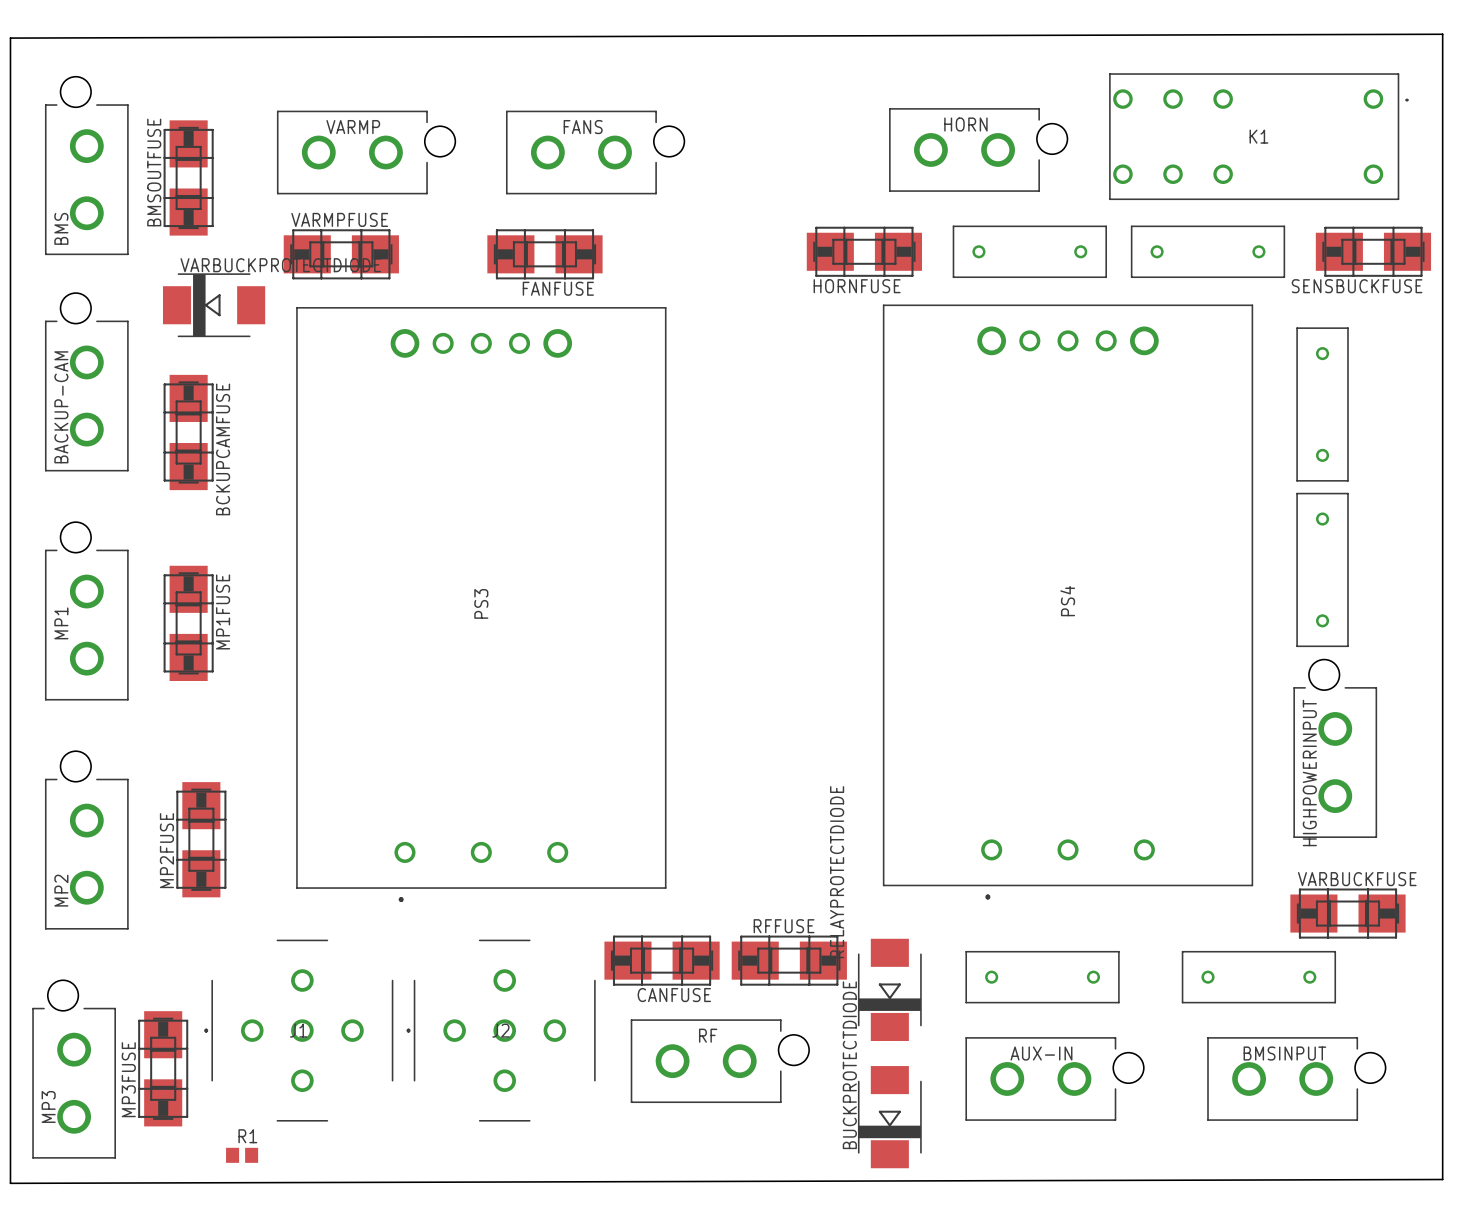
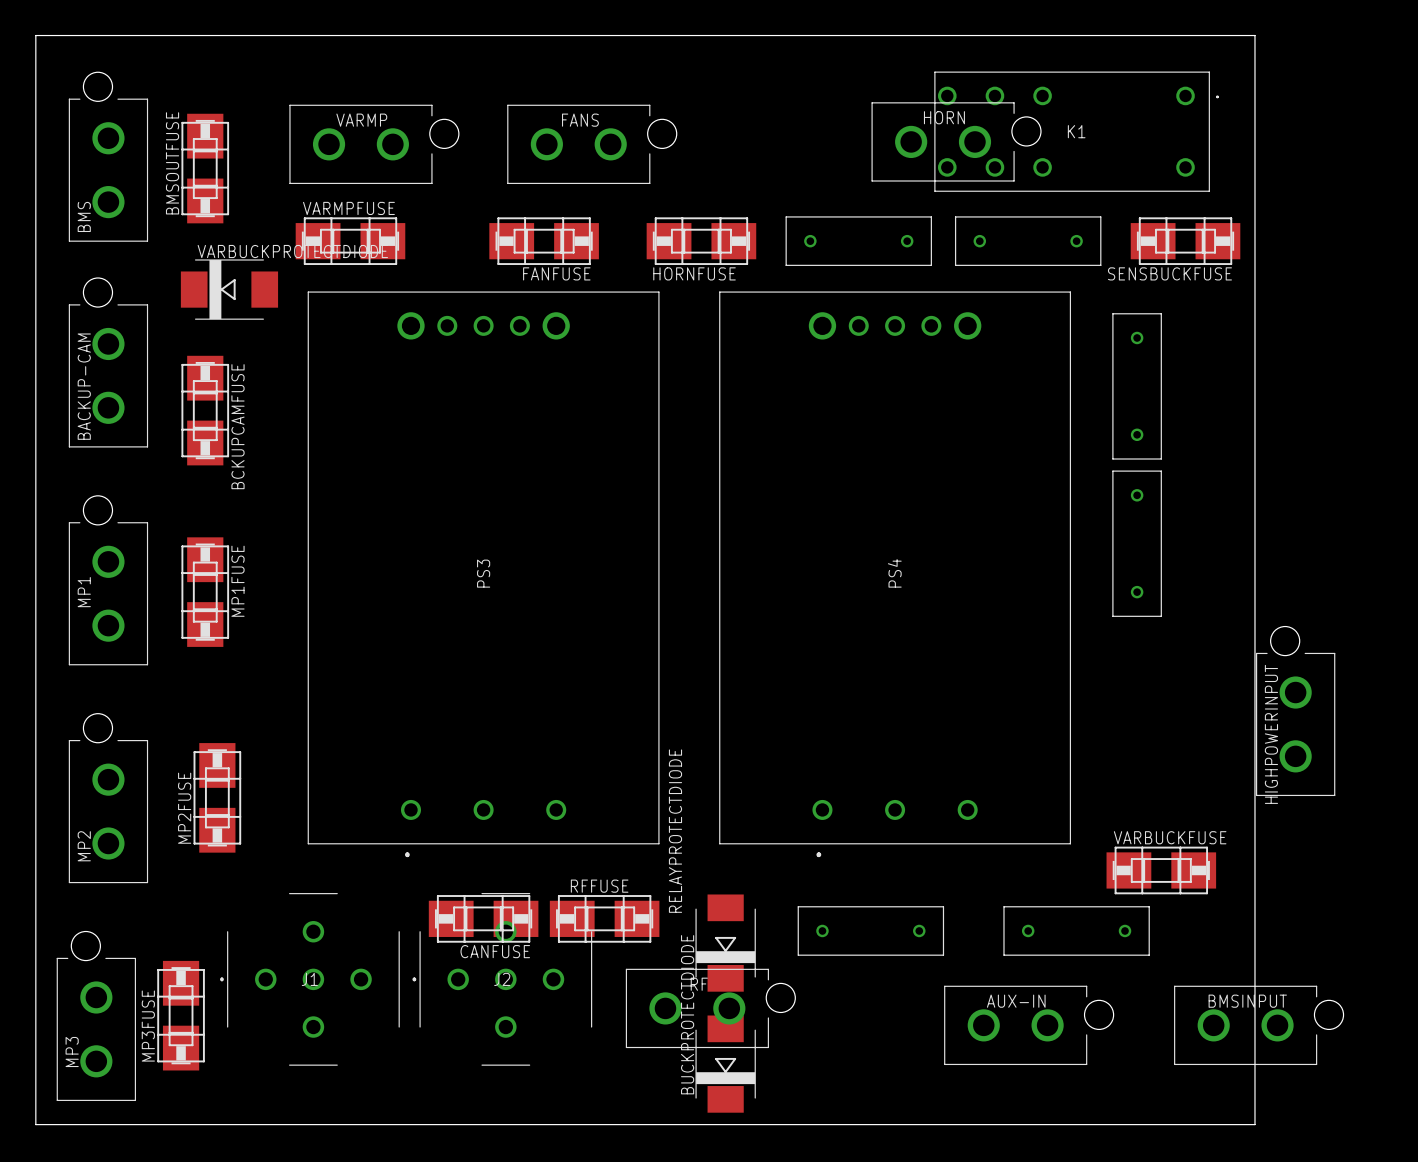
board edge: (10, 38) (1442, 34) (1442, 1179) (10, 1183) -> (35, 35) (1254, 35) (1254, 1124) (35, 1124)
K1 position: (1258, 136) -> (1076, 131)
HORNFUSE position: (864, 251) -> (701, 241)
part position: (1029, 251) -> (1028, 241)
part: (1208, 251) -> none
SENSBUCKFUSE position: (1373, 251) -> (1185, 241)
part: none -> (858, 241)
part: (1322, 404) -> none
part: none -> (1137, 386)
part: (1322, 569) -> none
part: none -> (1137, 543)
PS4 position: (1068, 602) -> (895, 574)
VARBUCKFUSE position: (1347, 913) -> (1161, 870)
CANFUSE position: (662, 960) -> (483, 918)
RFFUSE position: (789, 960) -> (604, 918)
part position: (1042, 977) -> (1076, 930)
part: (1258, 977) -> none
part: none -> (870, 930)
RELAYPROTECTDIODE position: (889, 989) -> (725, 943)
BUCKPROTECTDIODE position: (889, 1117) -> (725, 1064)
R1: (242, 1155) -> none

